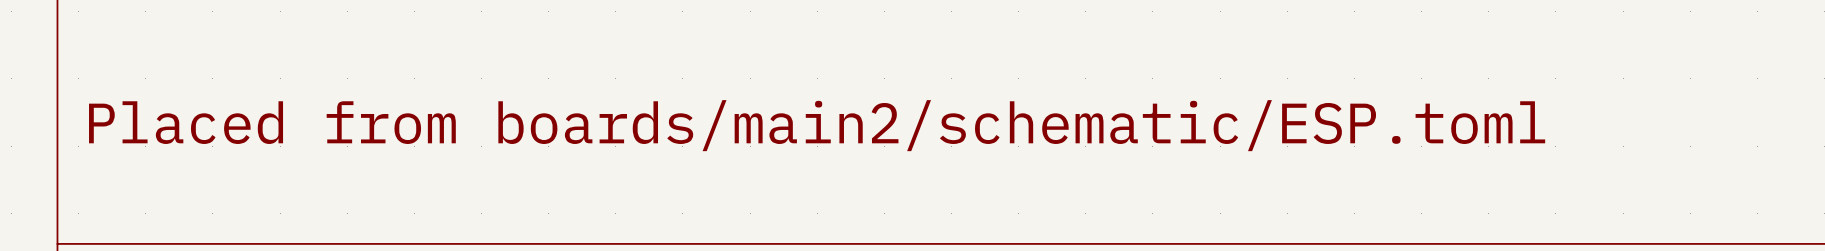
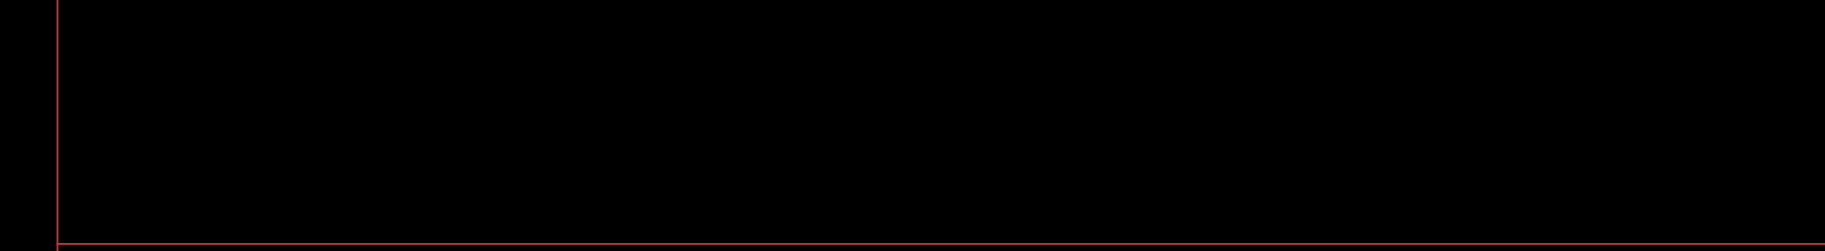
title block: Placed from boards/main2/schematic/ESP.toml (817, 125) -> none

